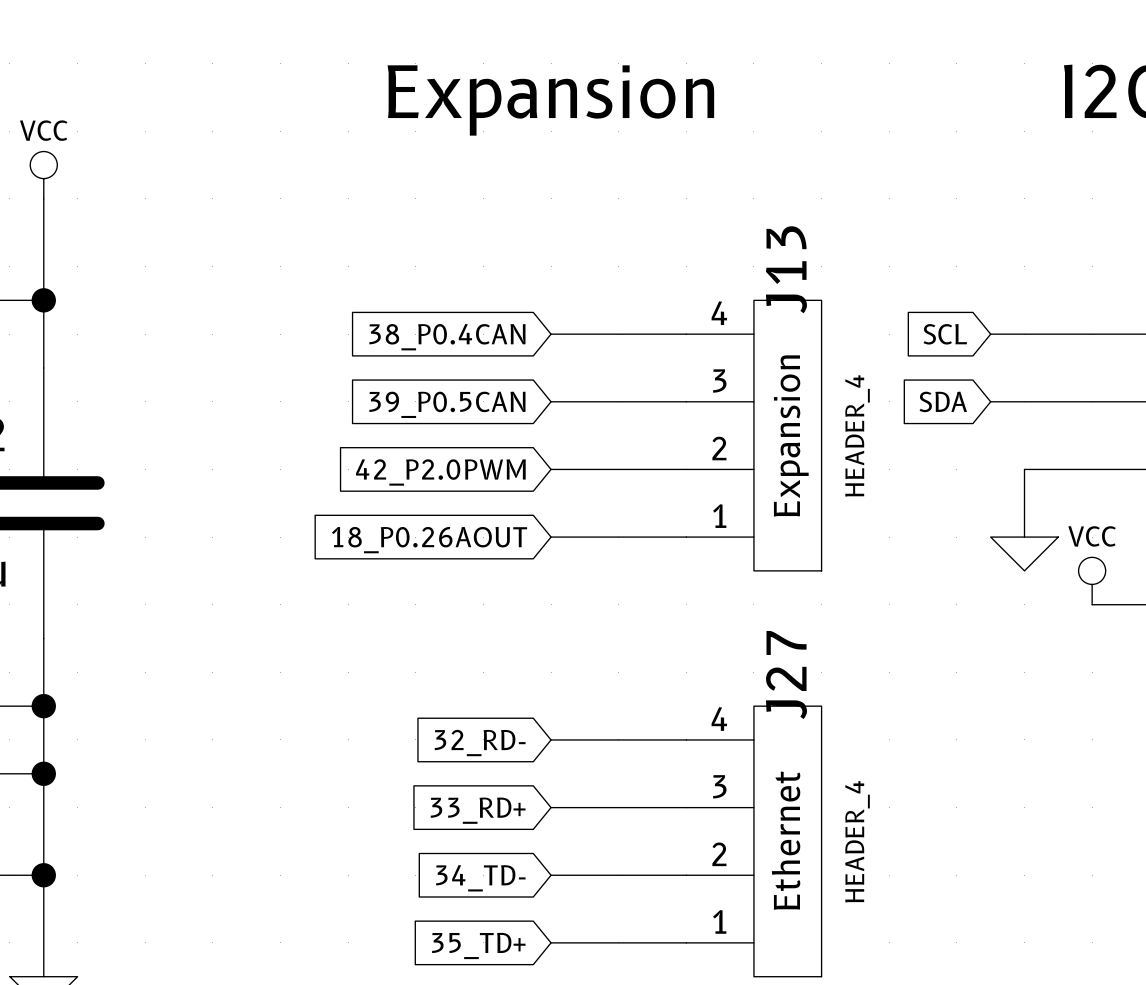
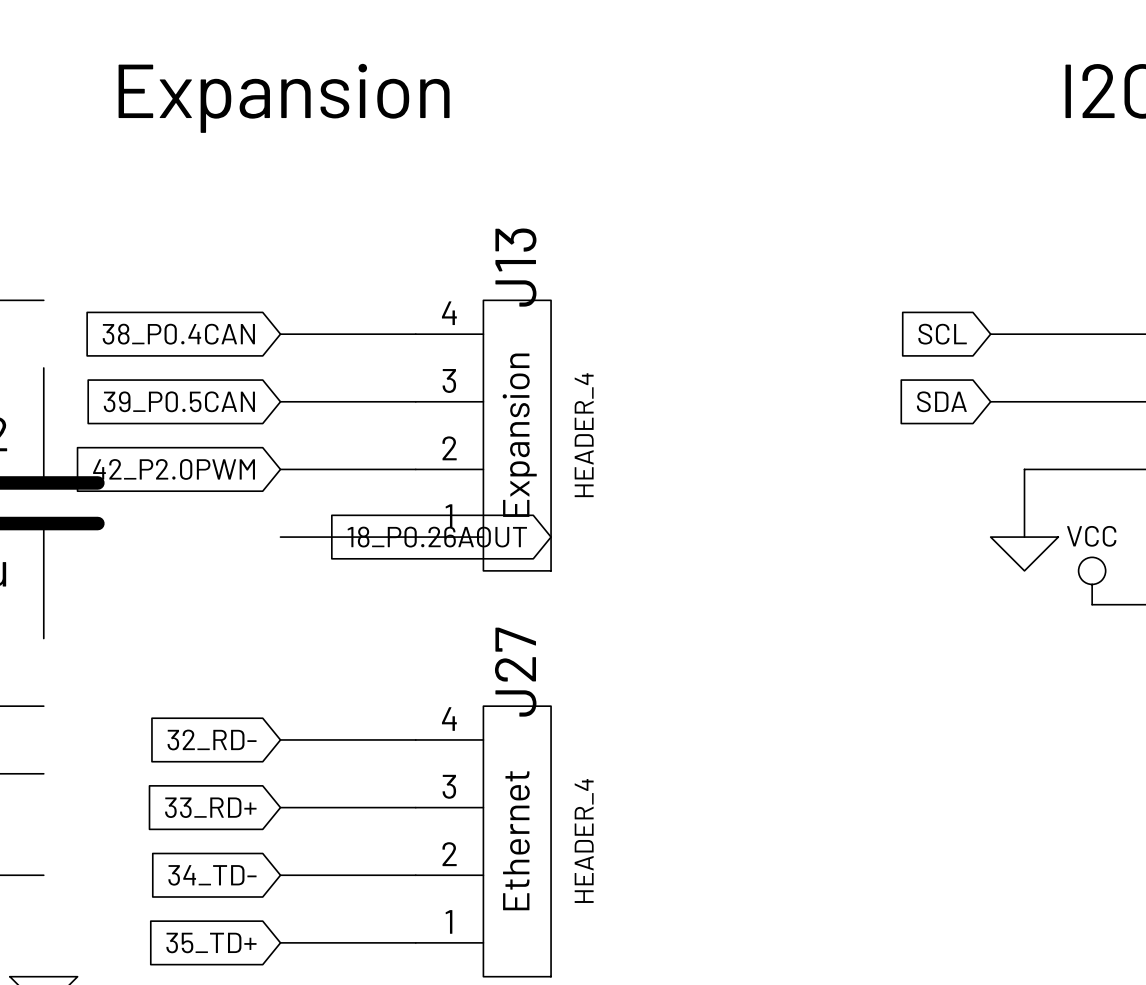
text position: Expansion (550, 100) -> Expansion (284, 98)
power symbol: VCC (43, 175) -> none
wire: (43, 198) (43, 367) -> none
junction: (43, 300) -> none
wire: (551, 334) (686, 334) -> (280, 334) (415, 334)
global label position: 38_P0.4CAN (447, 337) -> 38_P0.4CAN (178, 334)
wire: (551, 401) (686, 401) -> (280, 401) (415, 401)
global label position: 39_P0.5CAN (447, 404) -> 39_P0.5CAN (179, 401)
J13 position: (753, 435) -> (483, 435)
wire: (551, 469) (686, 469) -> (280, 469) (415, 469)
global label position: 42_P2.0PWM (440, 472) -> 42_P2.0PWM (174, 469)
wire: (551, 537) (686, 537) -> (280, 537) (415, 537)
wire: (43, 638) (43, 976) -> none
junction: (43, 706) -> none
wire: (551, 739) (686, 739) -> (280, 739) (415, 739)
global label position: 32_RD- (480, 743) -> 32_RD- (212, 739)
junction: (43, 773) -> none
wire: (551, 807) (686, 807) -> (280, 807) (415, 807)
global label position: 33_RD+ (478, 810) -> 33_RD+ (210, 807)
J27 position: (753, 841) -> (483, 841)
junction: (43, 875) -> none
wire: (551, 875) (686, 875) -> (280, 875) (415, 875)
global label position: 34_TD- (480, 878) -> 34_TD- (212, 875)
wire: (551, 942) (686, 942) -> (280, 942) (415, 942)
global label position: 35_TD+ (478, 945) -> 35_TD+ (211, 943)

